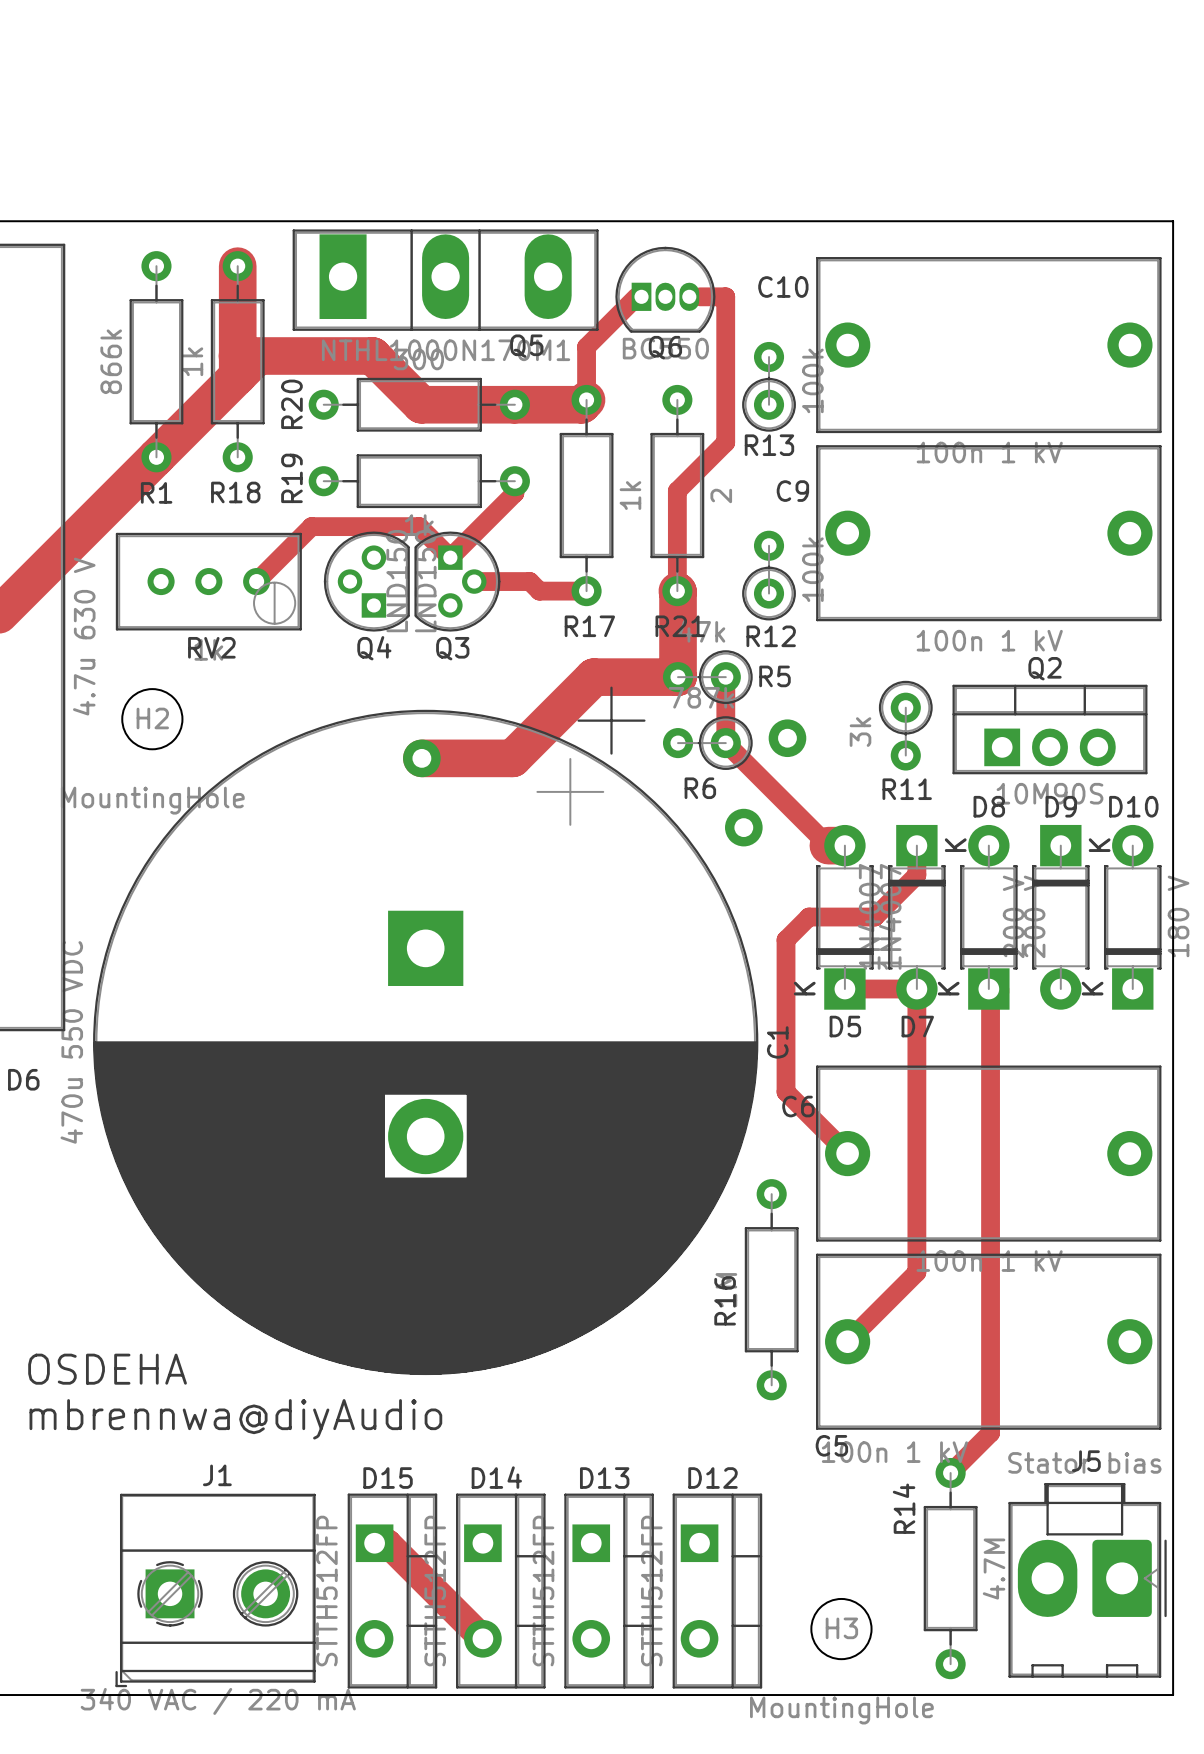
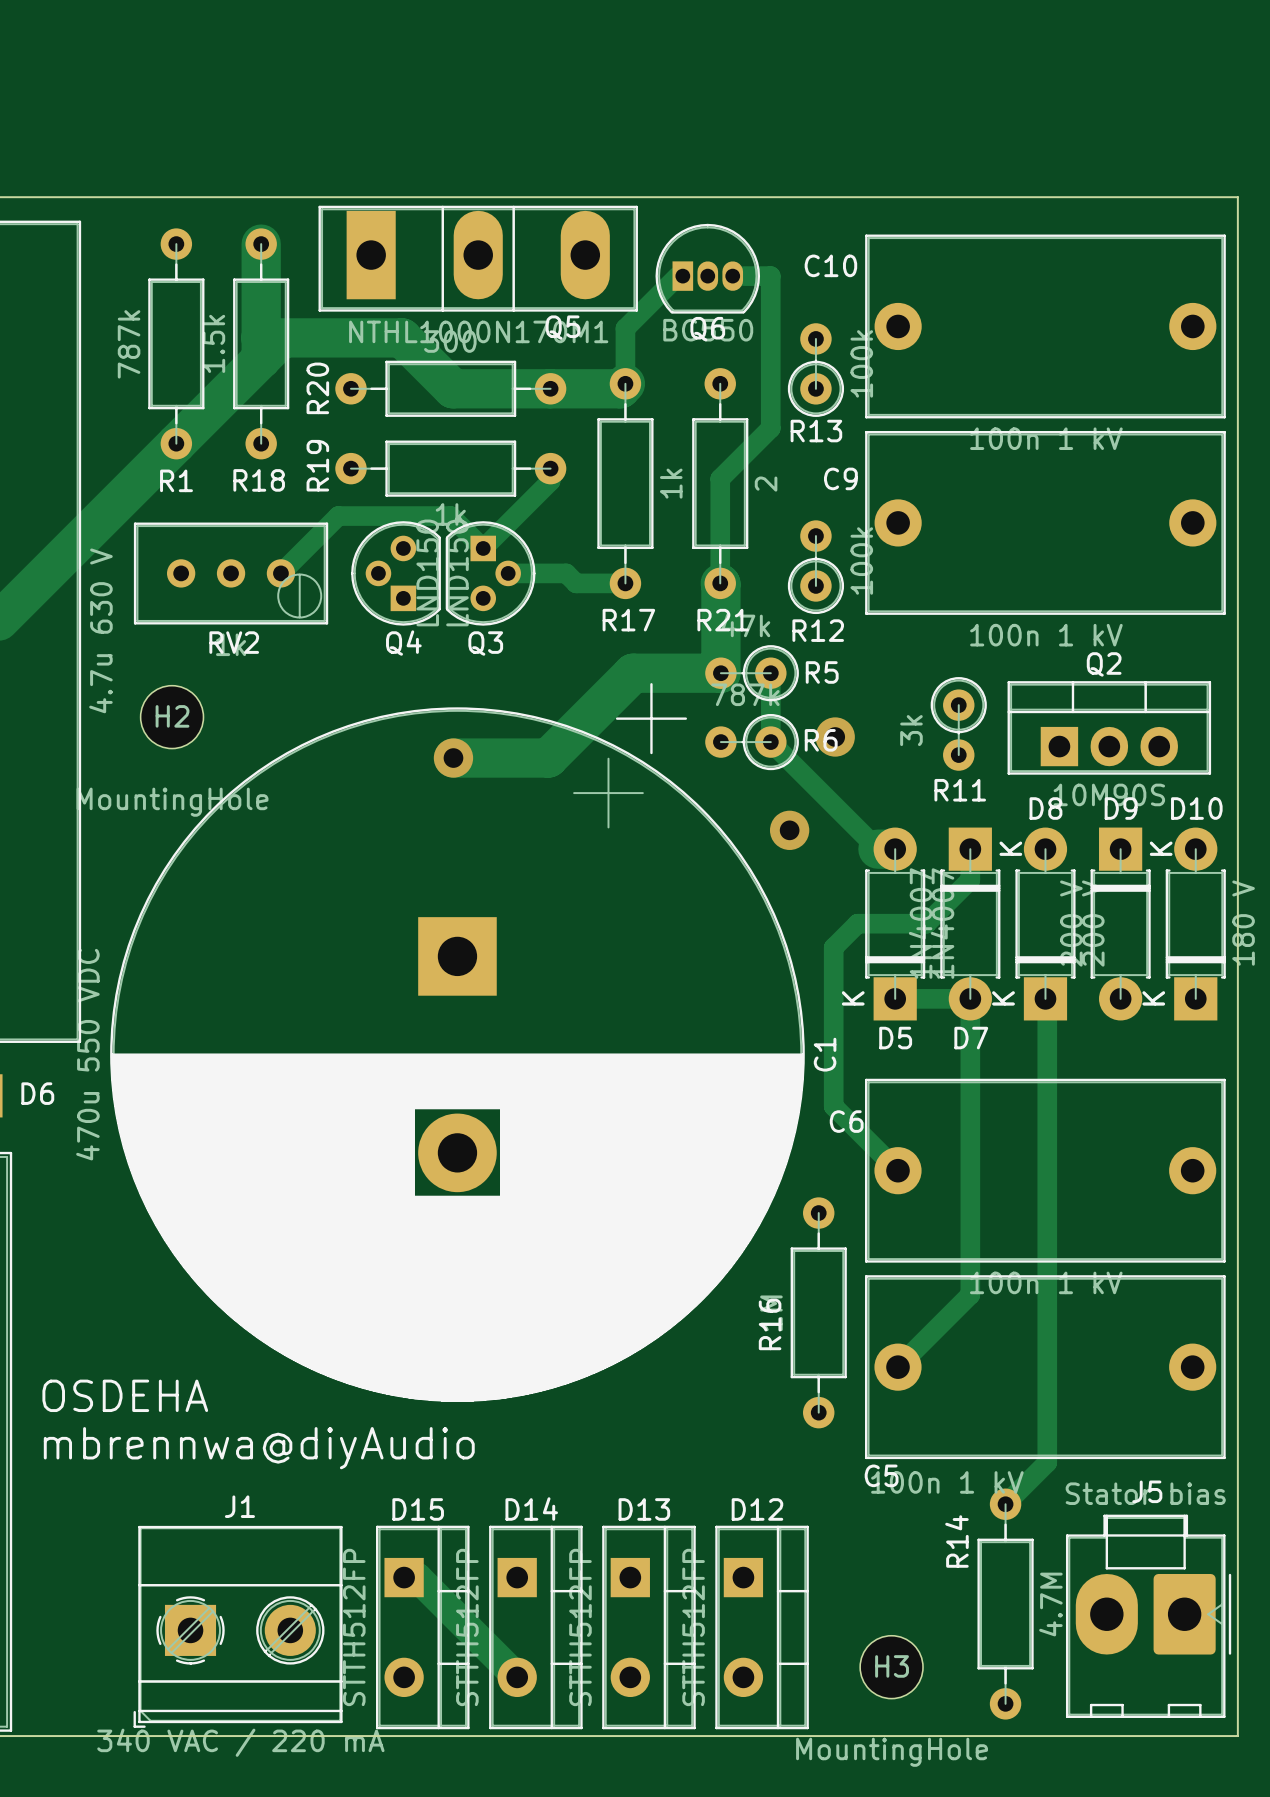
R1 value: 866k (111, 361) -> 787k (129, 344)
R18 value: 1k (192, 361) -> 1.5k (213, 343)
R6 name position: R6 (700, 788) -> R6 (821, 740)

